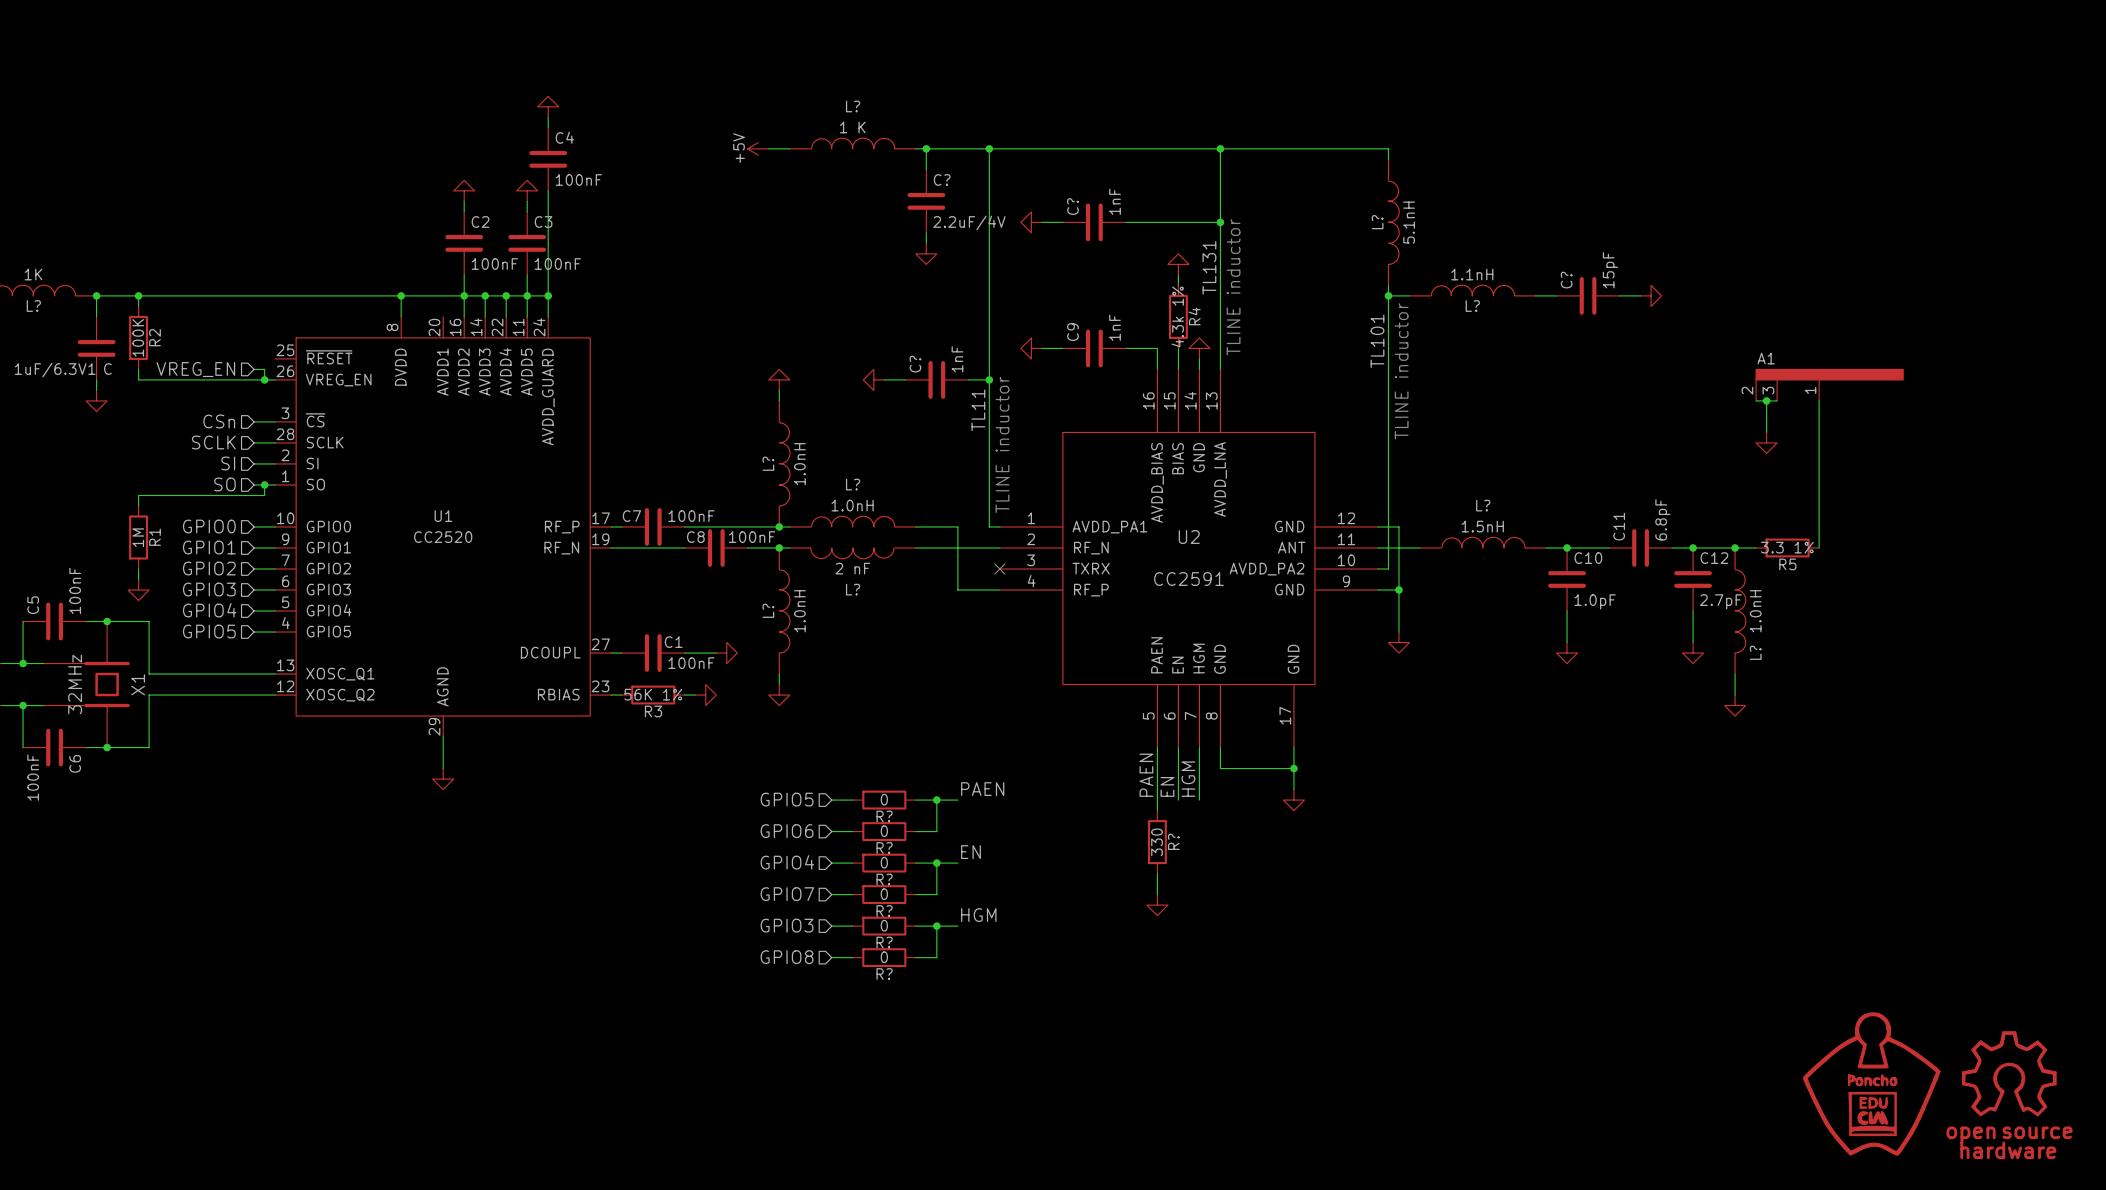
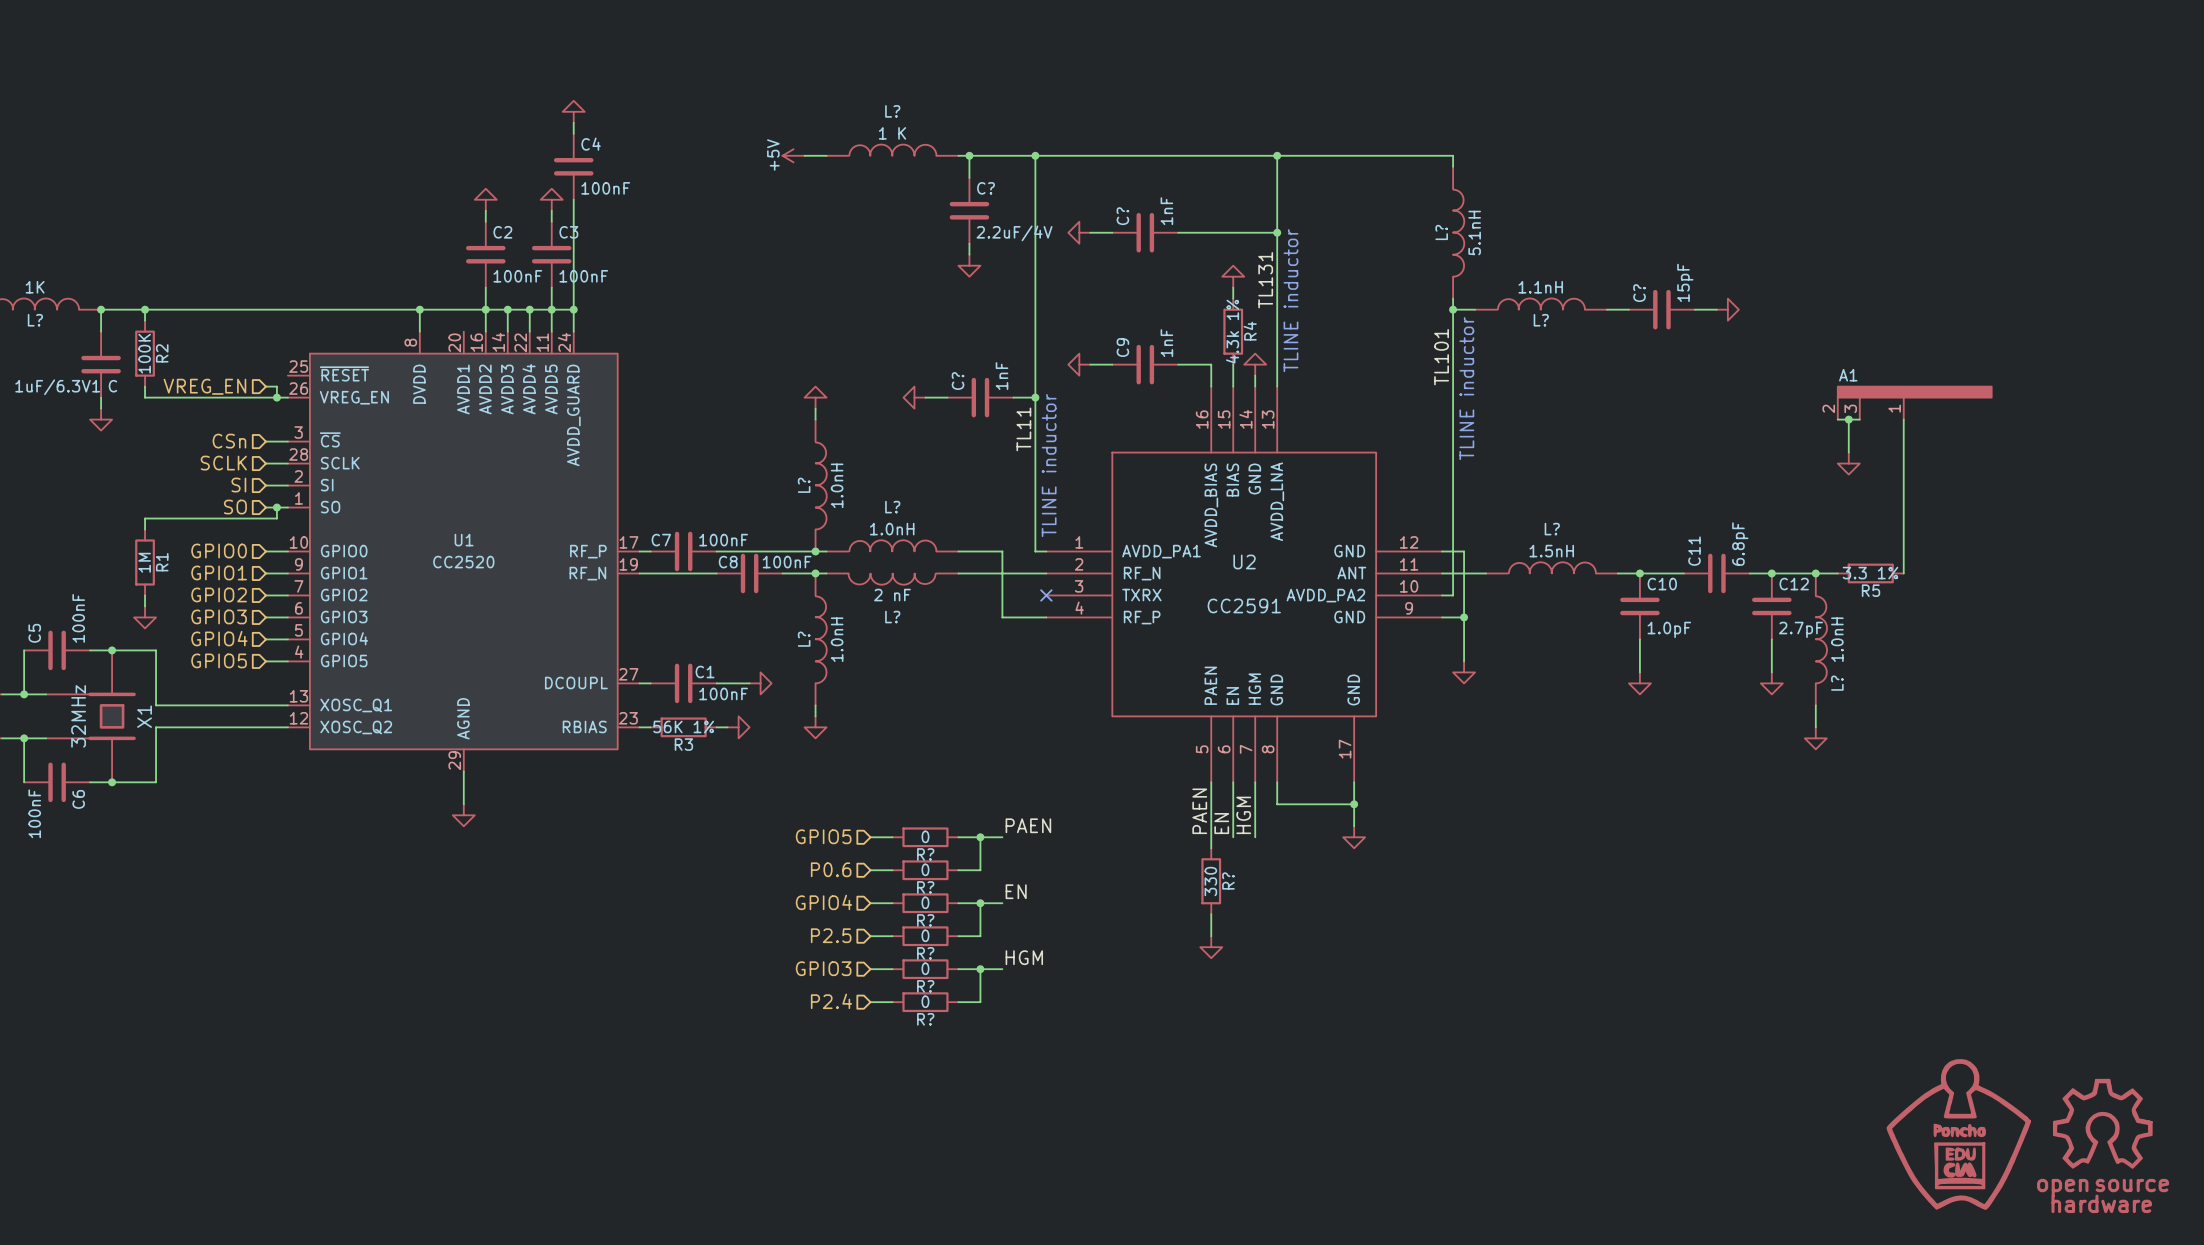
hierarchical label: GPIO6 (787, 831) -> P0.6 (831, 869)
hierarchical label: GPIO7 (787, 894) -> P2.5 (831, 935)
hierarchical label: GPIO8 (787, 957) -> P2.4 (831, 1001)

